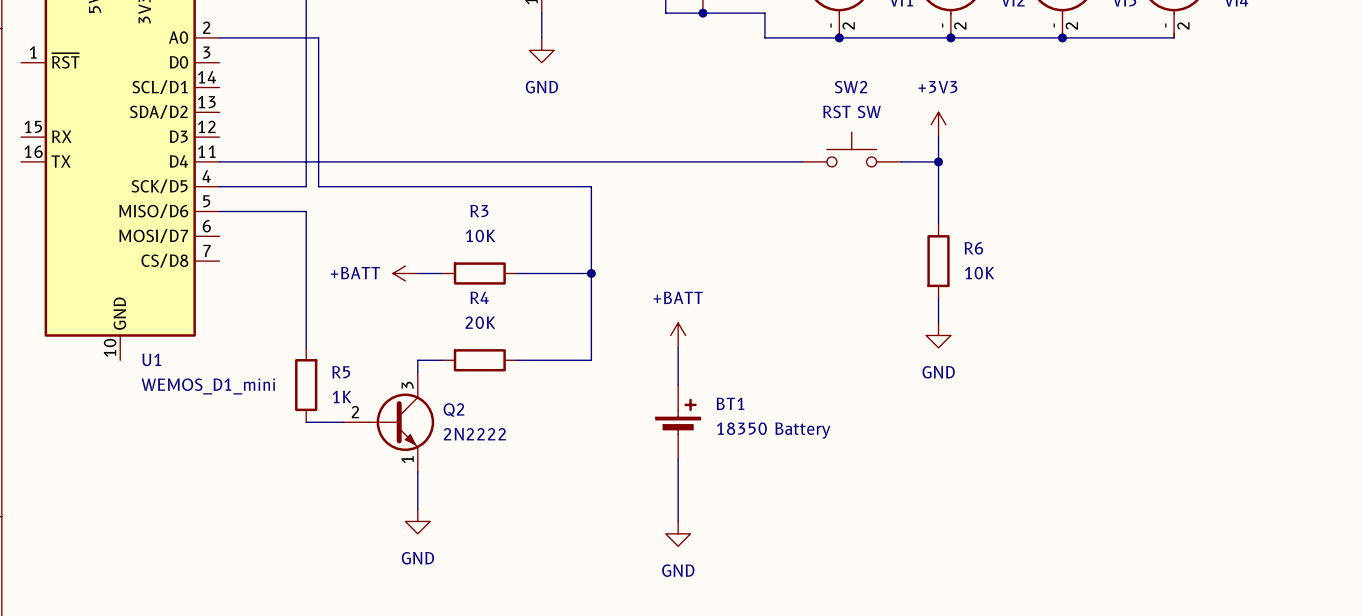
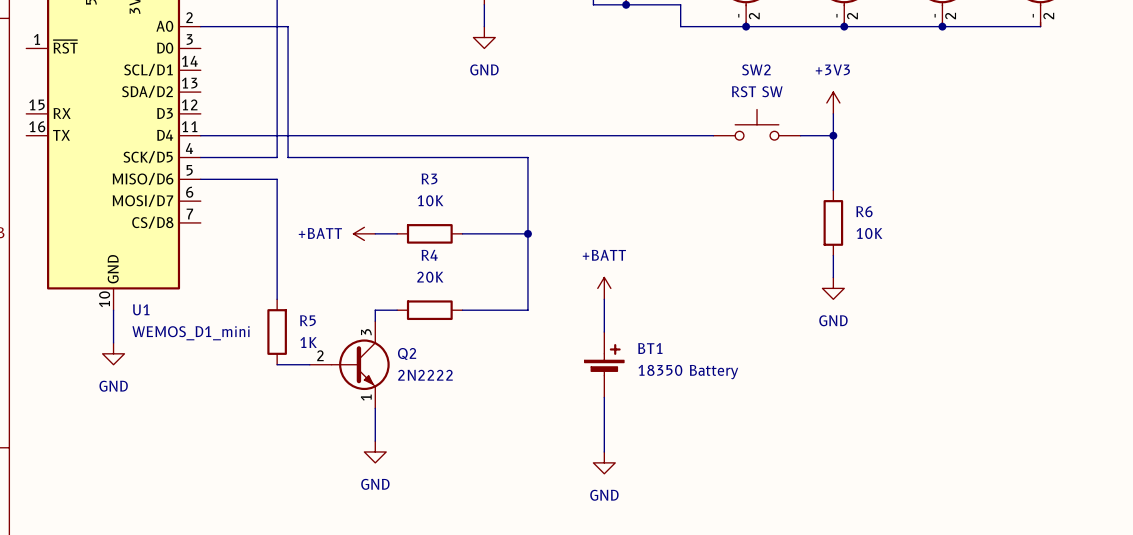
wire: none -> (113, 310) (113, 342)
power symbol: none -> GND (113, 353)

